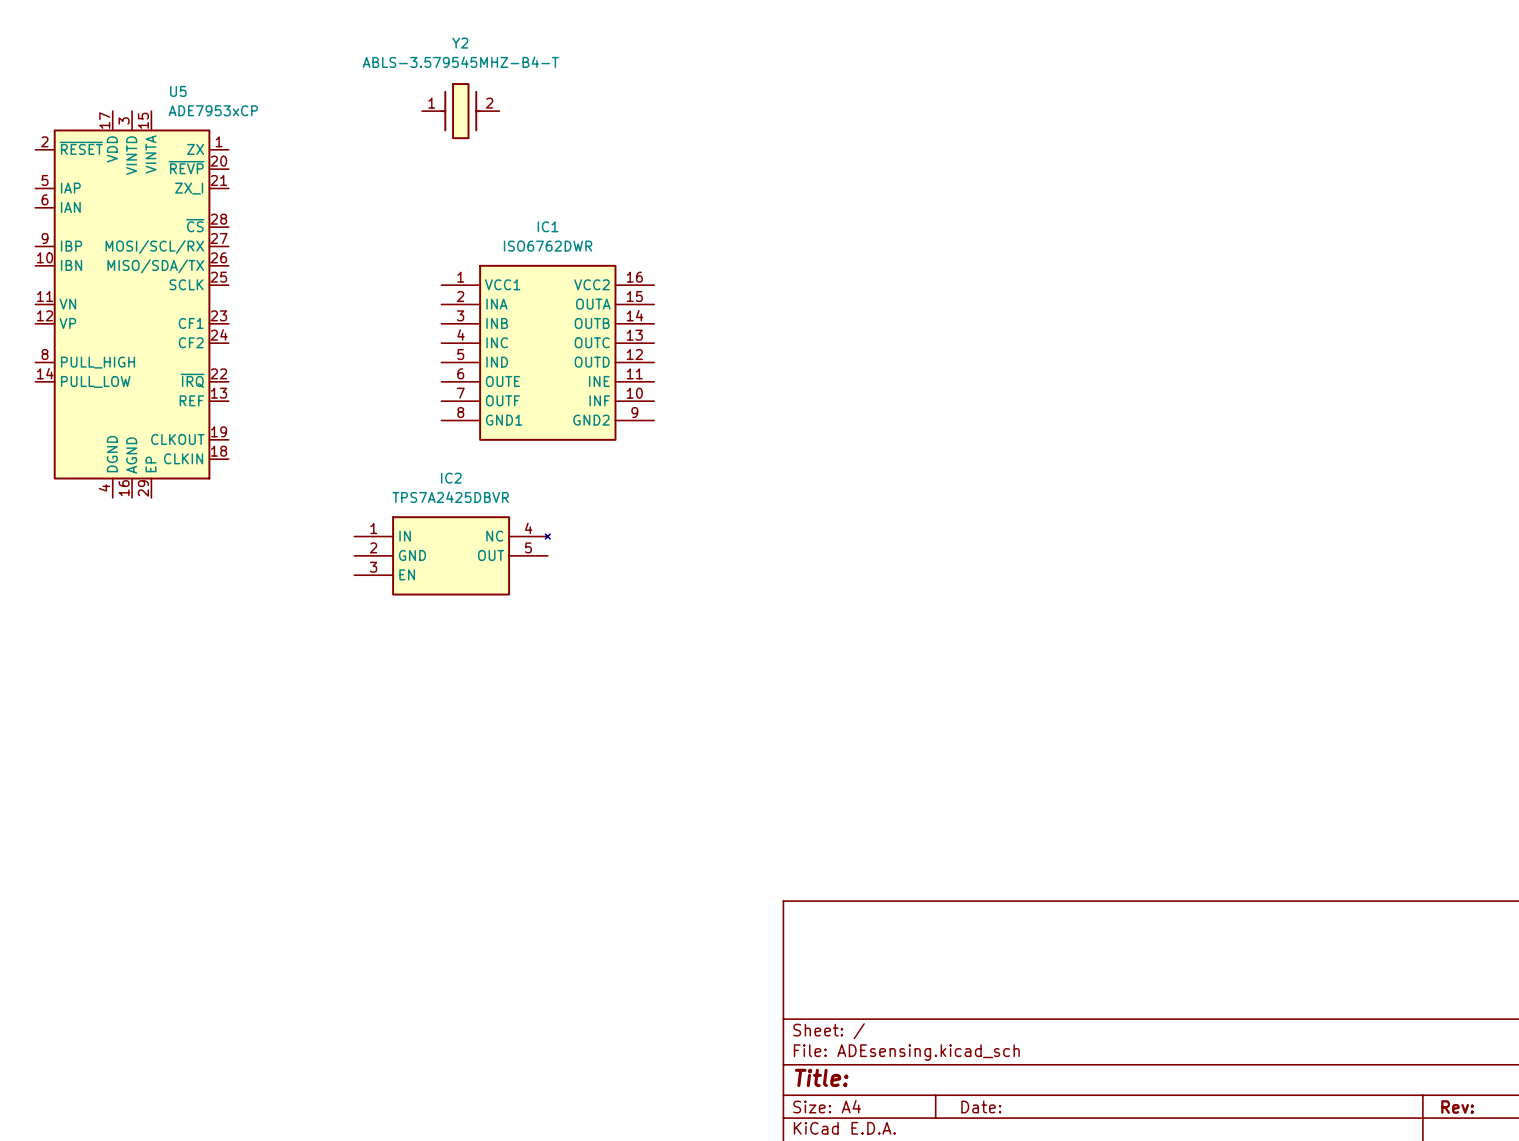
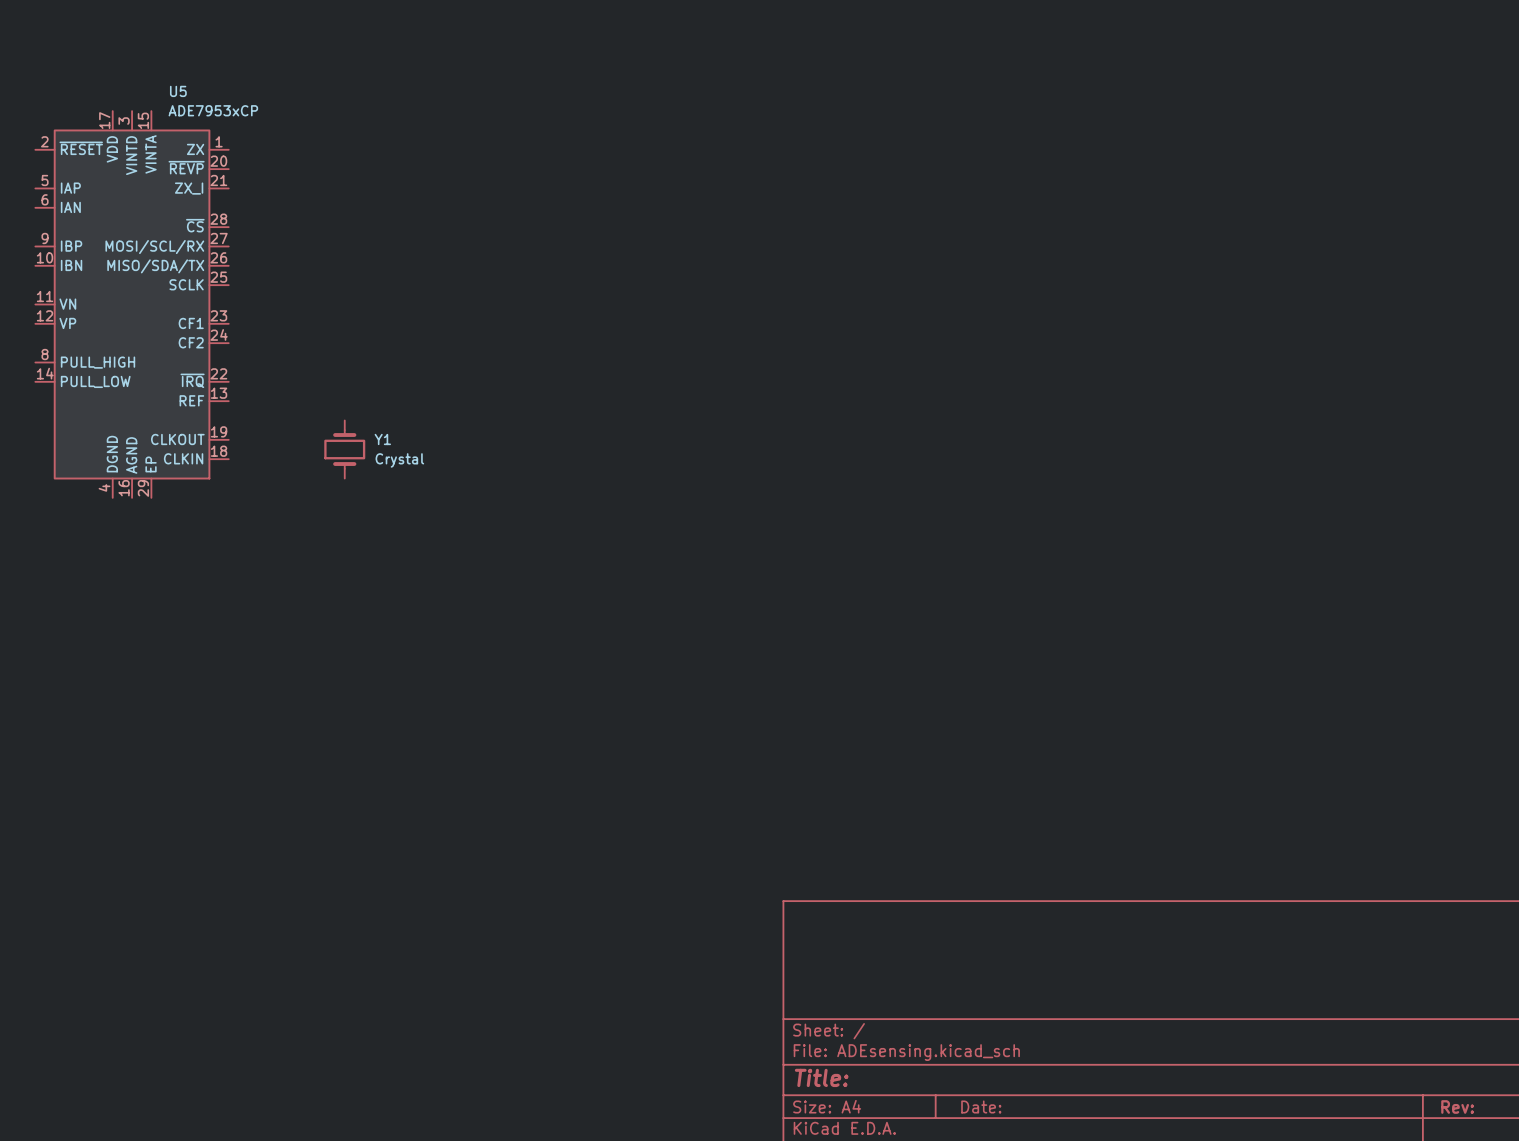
Y2: ABLS-3.579545MHZ-B4-T (460, 111) -> none
IC1: ISO6762DWR (547, 352) -> none
Y1: none -> Crystal (344, 449)
IC2: TPS7A2425DBVR (452, 555) -> none

